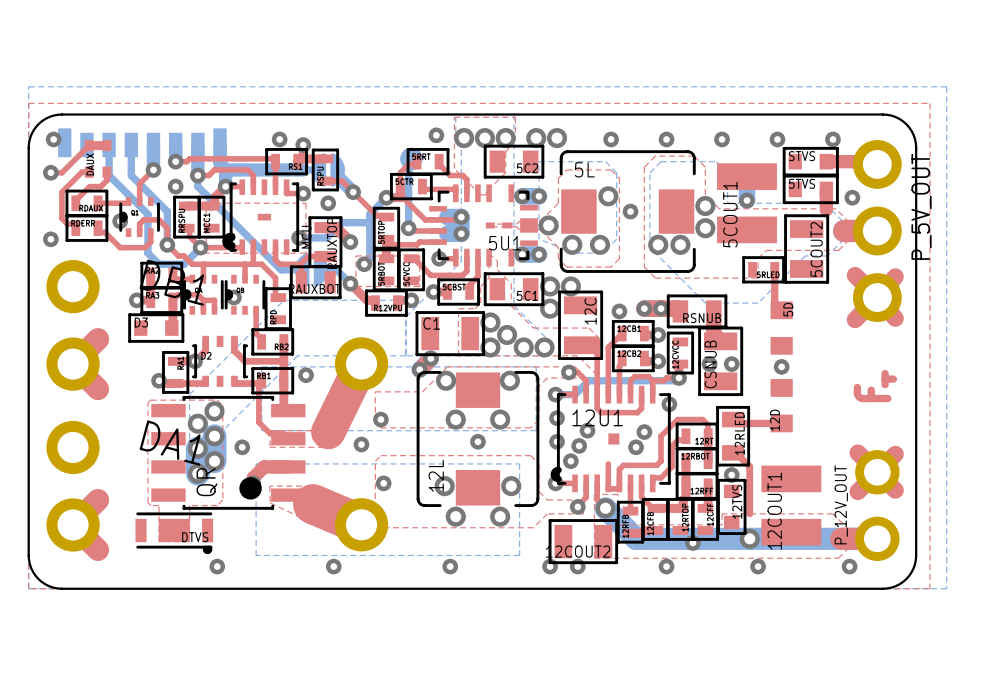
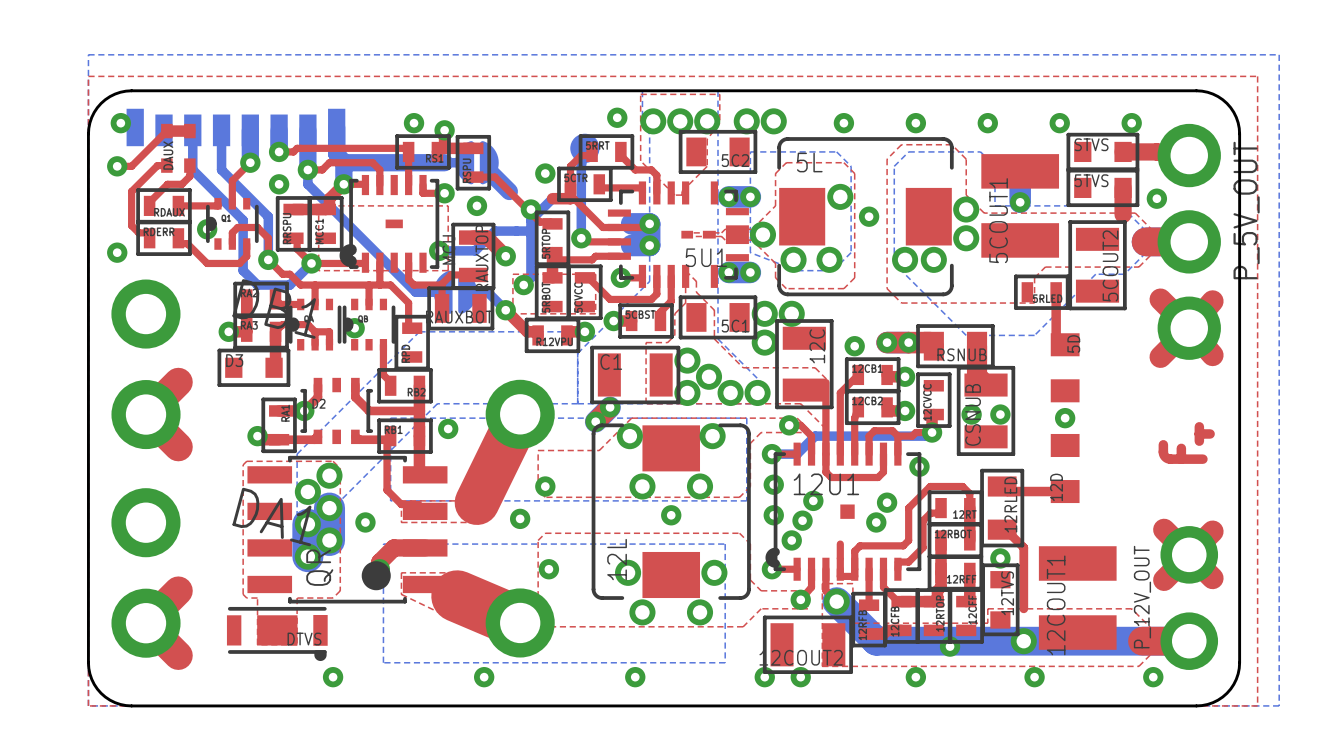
via: none -> (545, 173)
via: (353, 192) -> none
via: (386, 197) -> none
via: none -> (530, 209)

